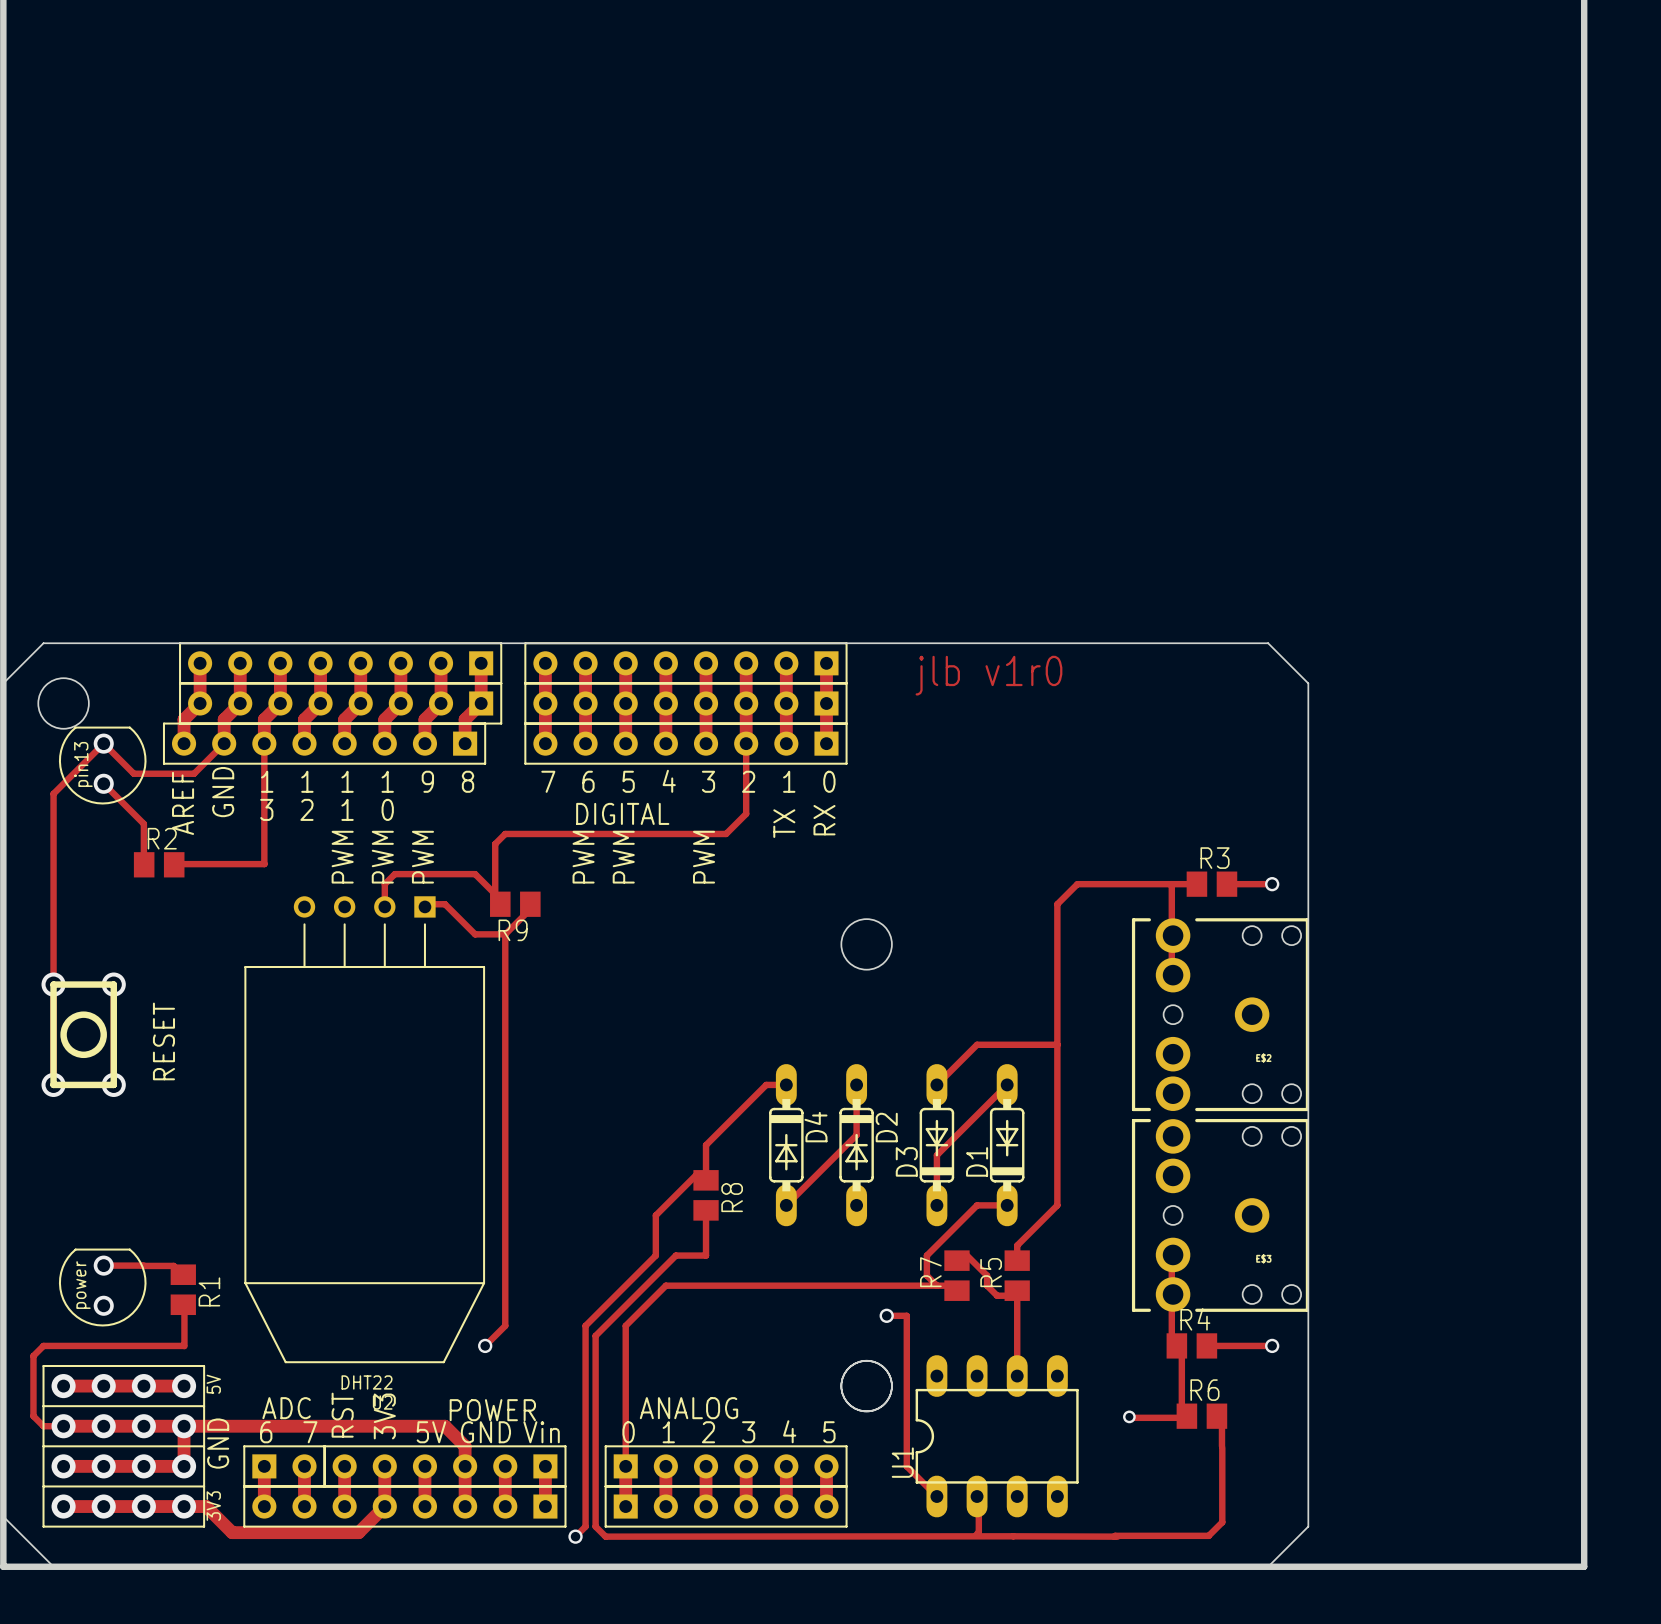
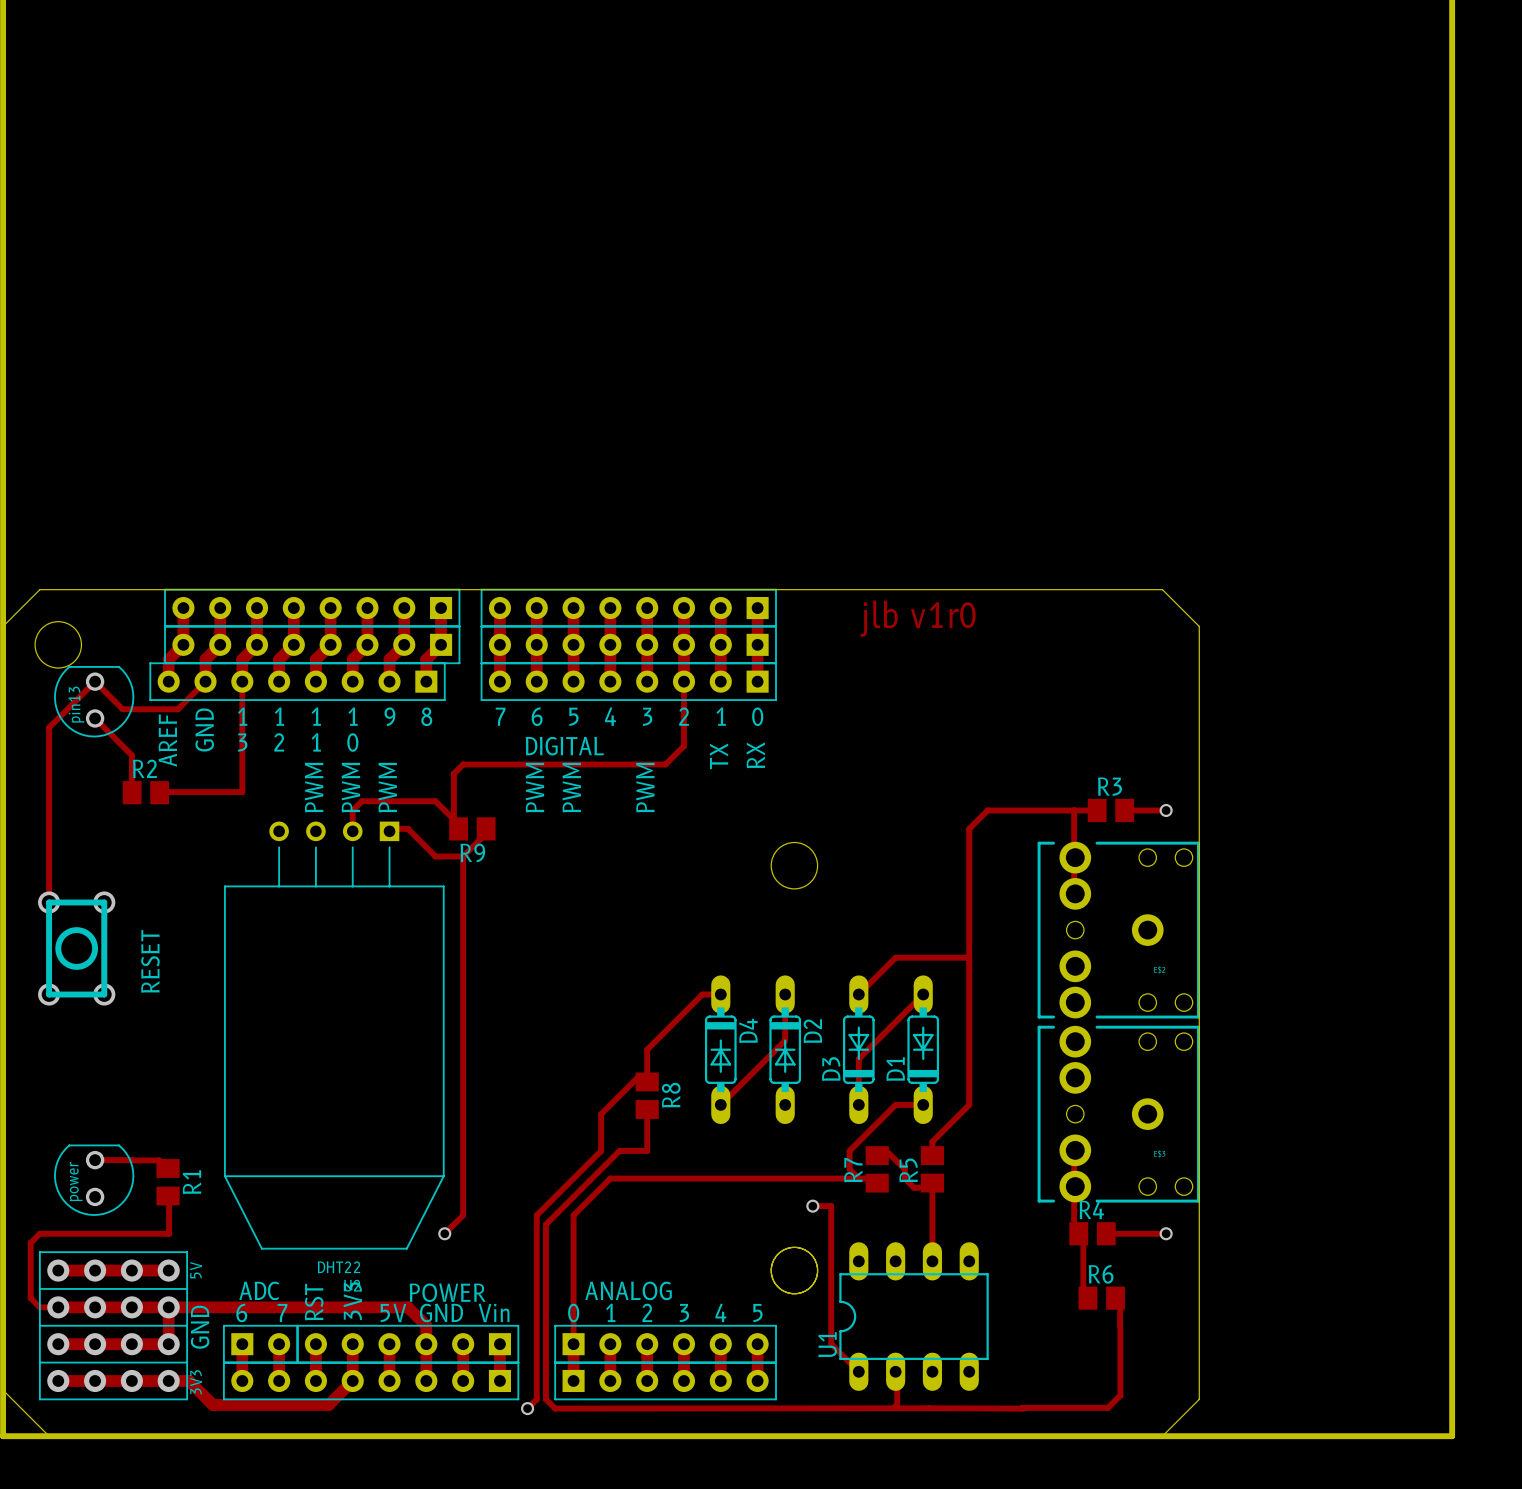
via: (1129, 1416) -> none
track: (1185, 1416) (1129, 1417) -> none

